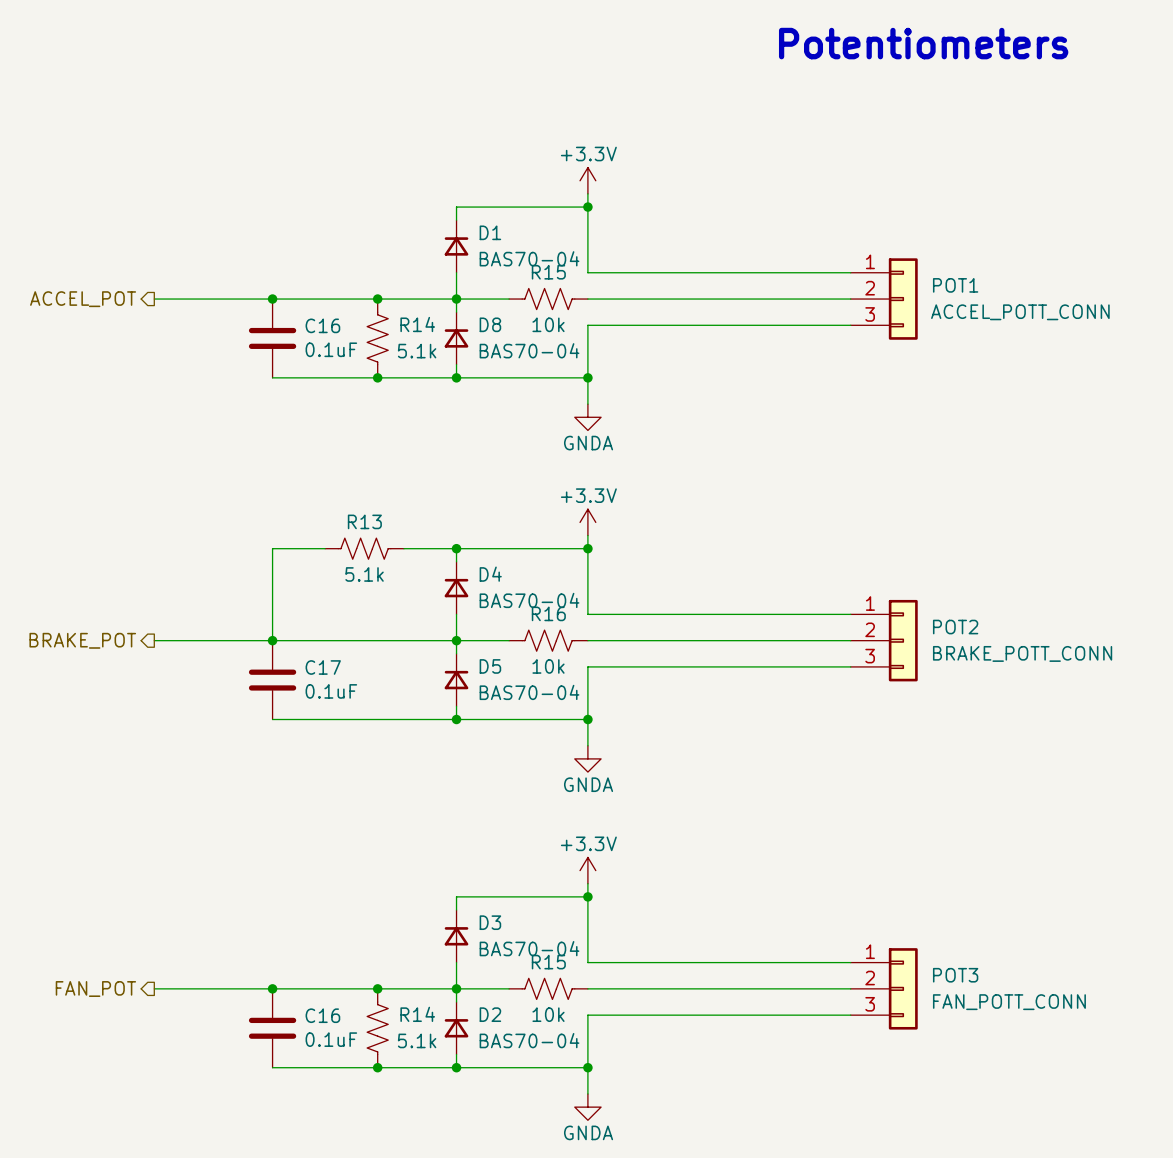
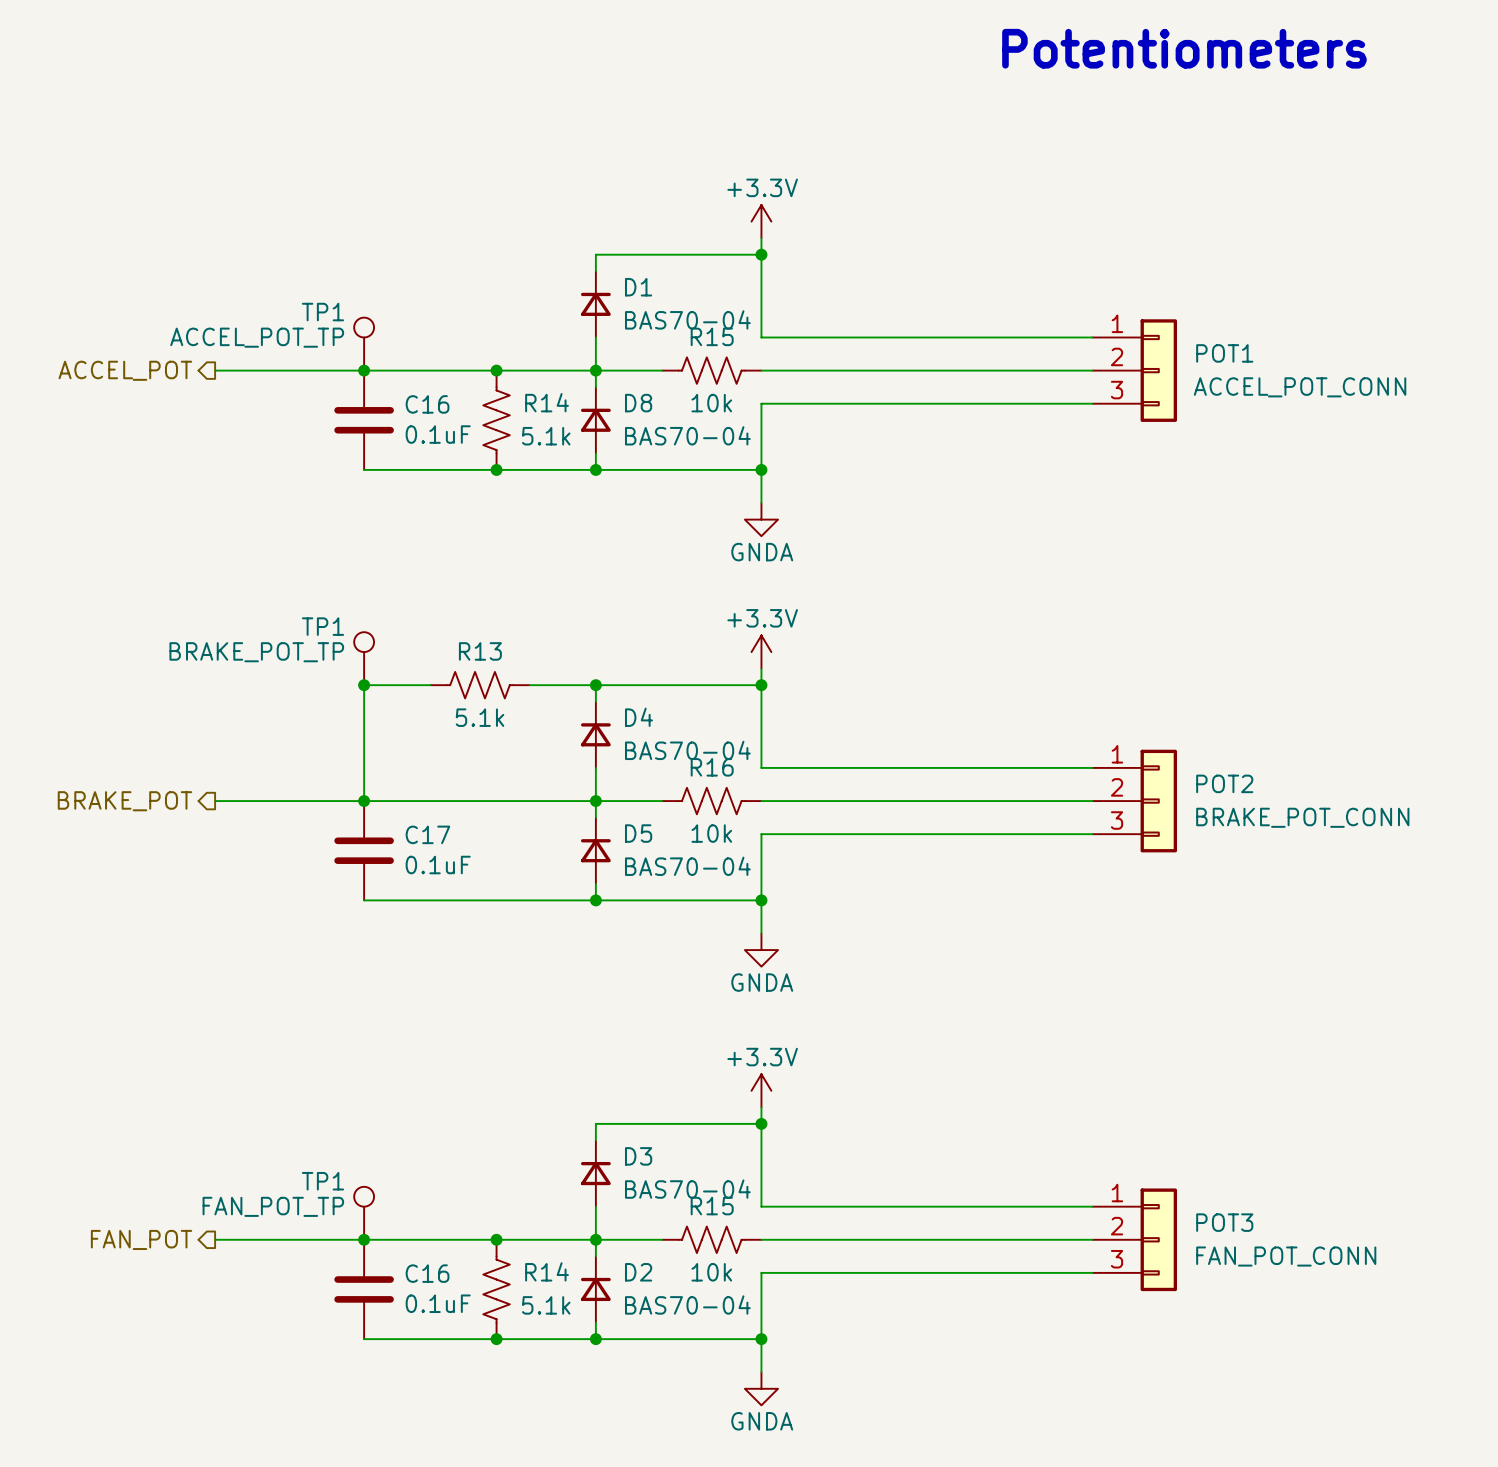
TP1: none -> ACCEL_POT_TP (364, 344)
POT1 value: ACCEL_POTT_CONN (1020, 312) -> ACCEL_POT_CONN (1300, 387)
TP1: none -> BRAKE_POT_TP (364, 658)
junction: none -> (364, 685)
POT2 value: BRAKE_POTT_CONN (1022, 653) -> BRAKE_POT_CONN (1302, 817)
TP1: none -> FAN_POT_TP (364, 1213)
POT3 value: FAN_POTT_CONN (1009, 1002) -> FAN_POT_CONN (1286, 1256)

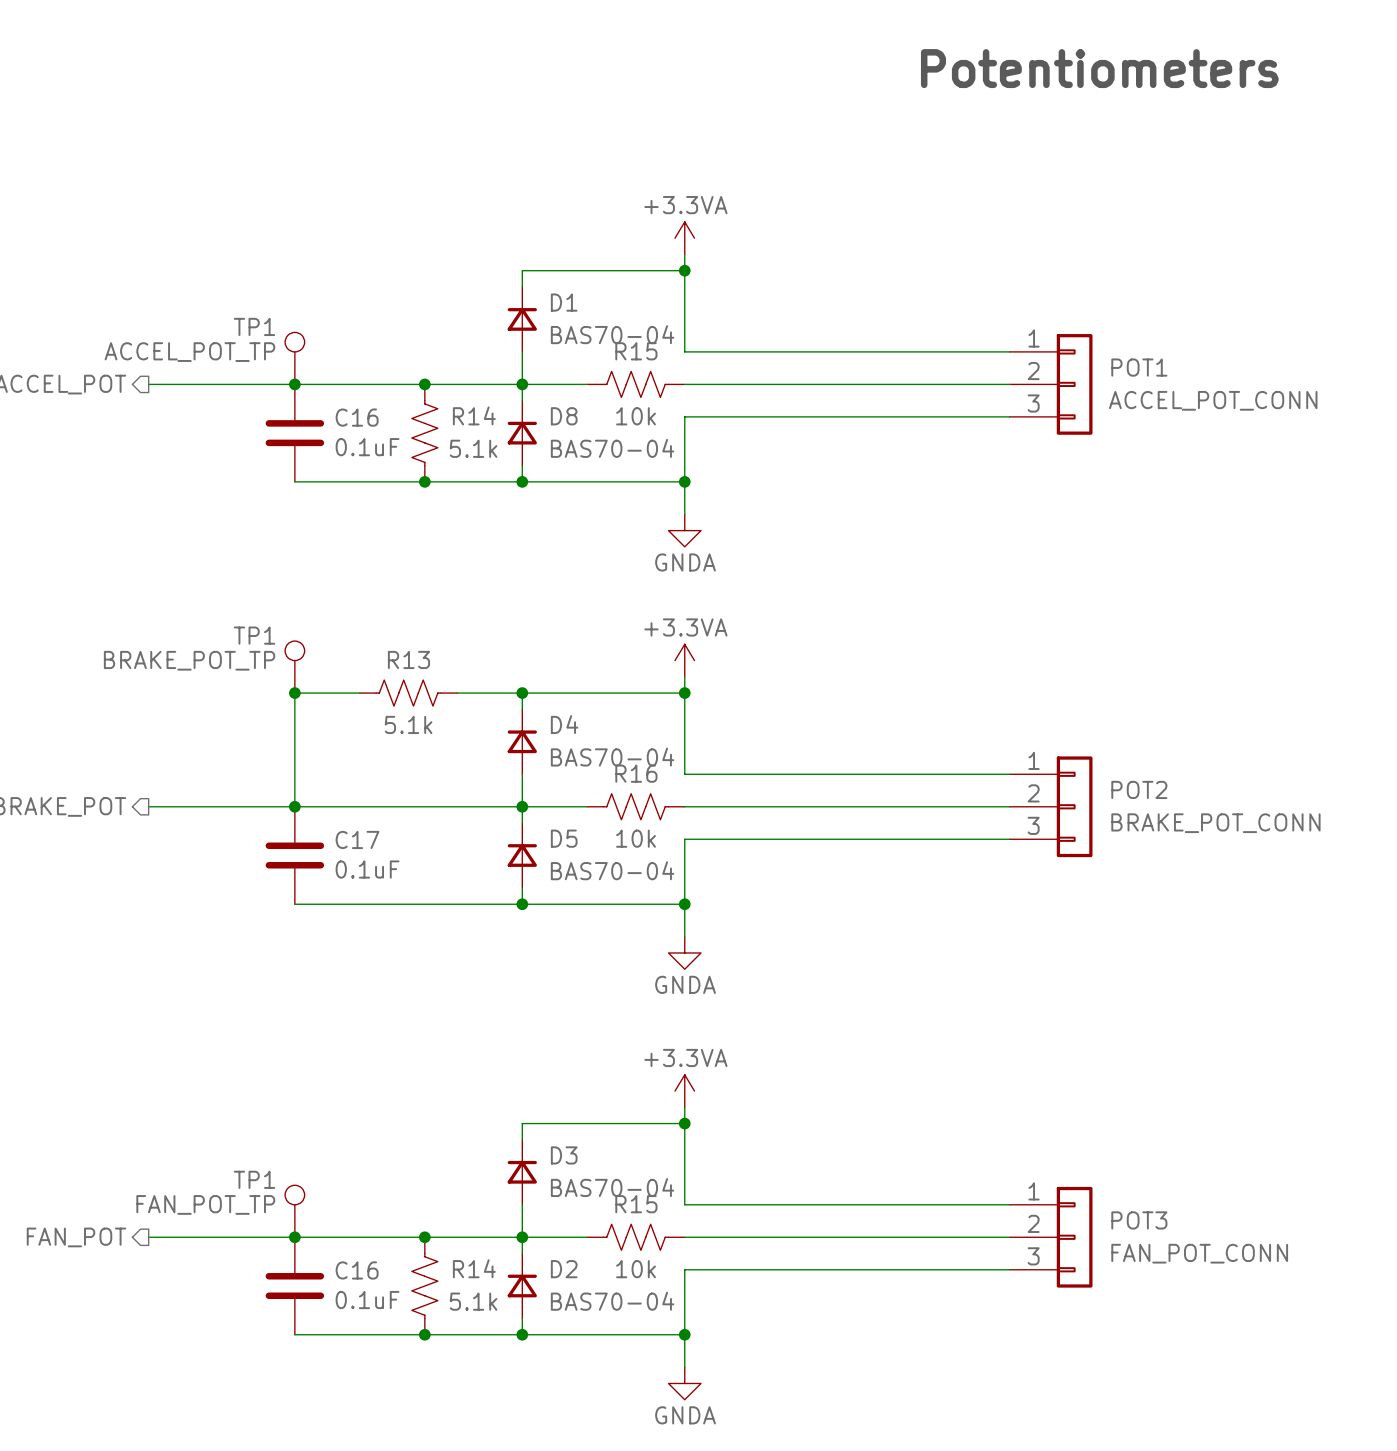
power symbol: +3.3V (761, 221) -> +3.3VA (684, 238)
power symbol: +3.3V (761, 652) -> +3.3VA (684, 660)
power symbol: +3.3V (761, 1090) -> +3.3VA (684, 1091)

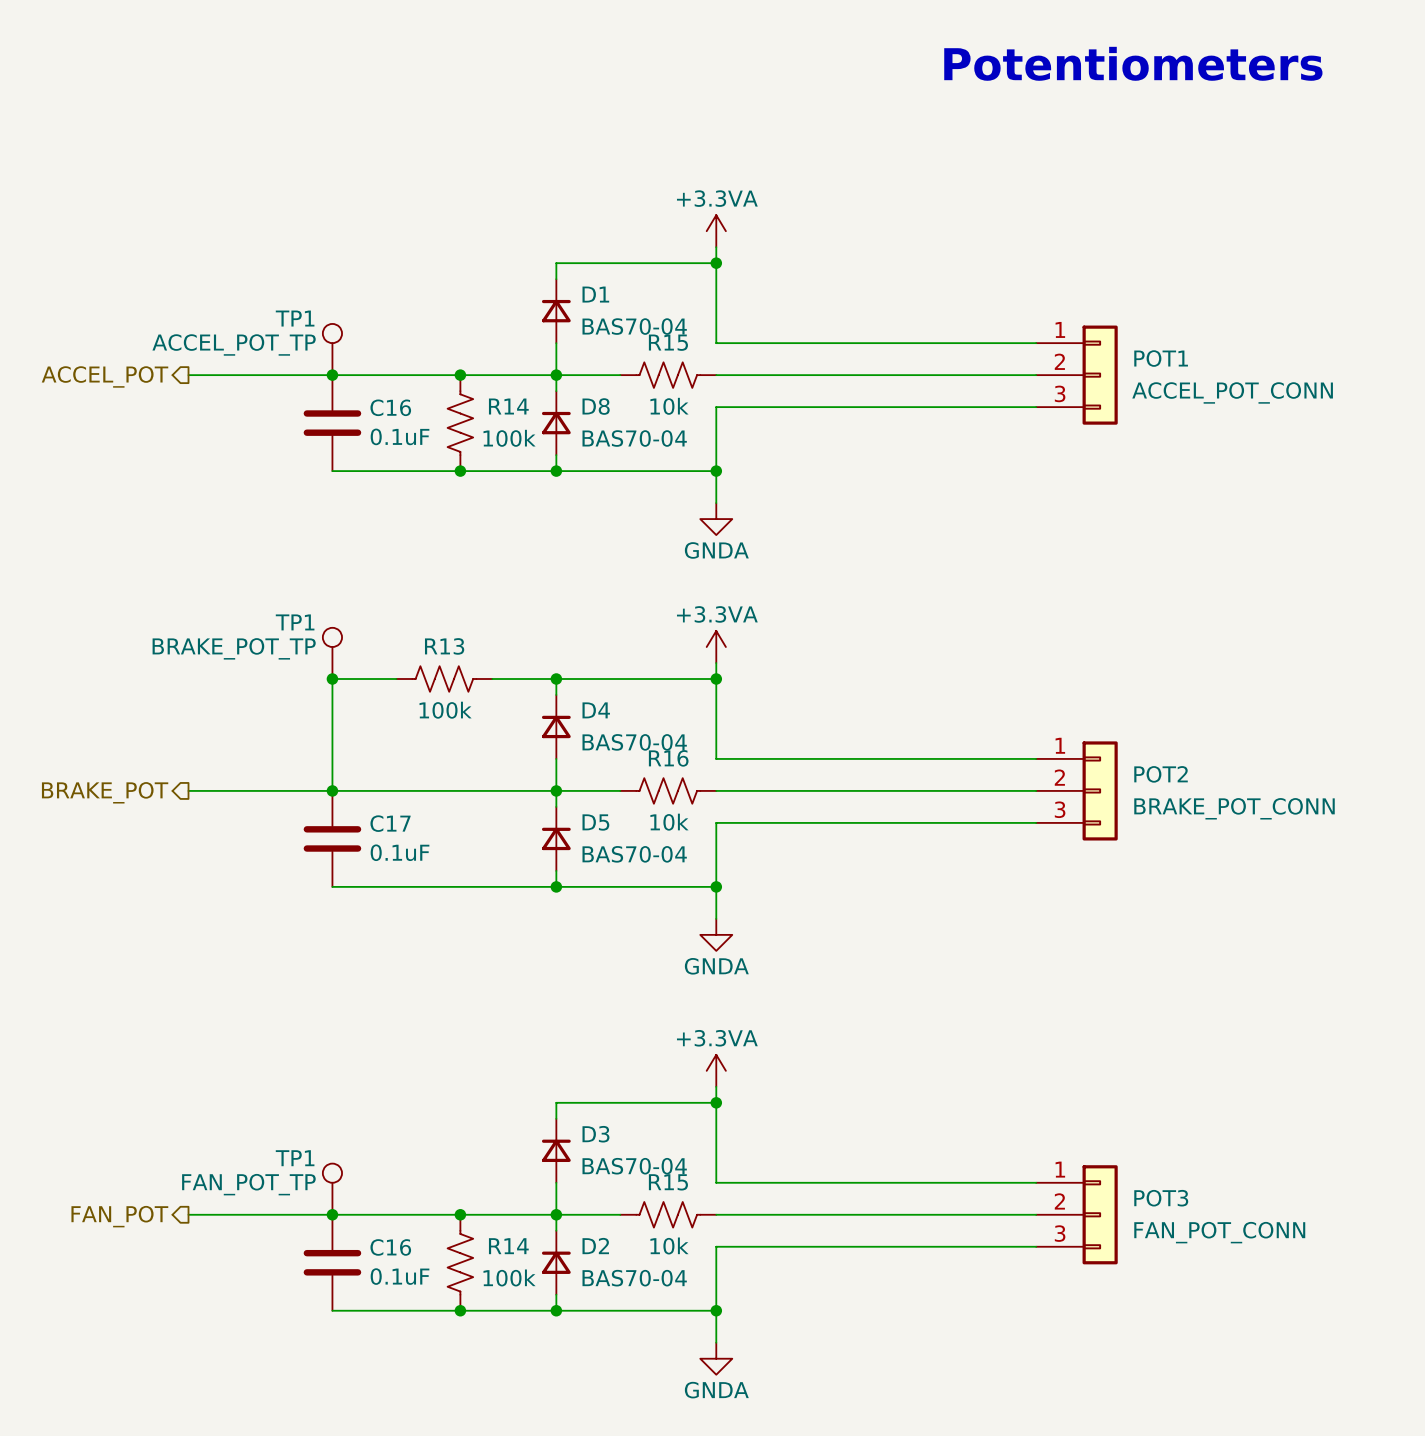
R14 value: 5.1k (473, 448) -> 100k (509, 438)
R13 value: 5.1k (408, 724) -> 100k (445, 710)
R14 value: 5.1k (473, 1301) -> 100k (509, 1277)

